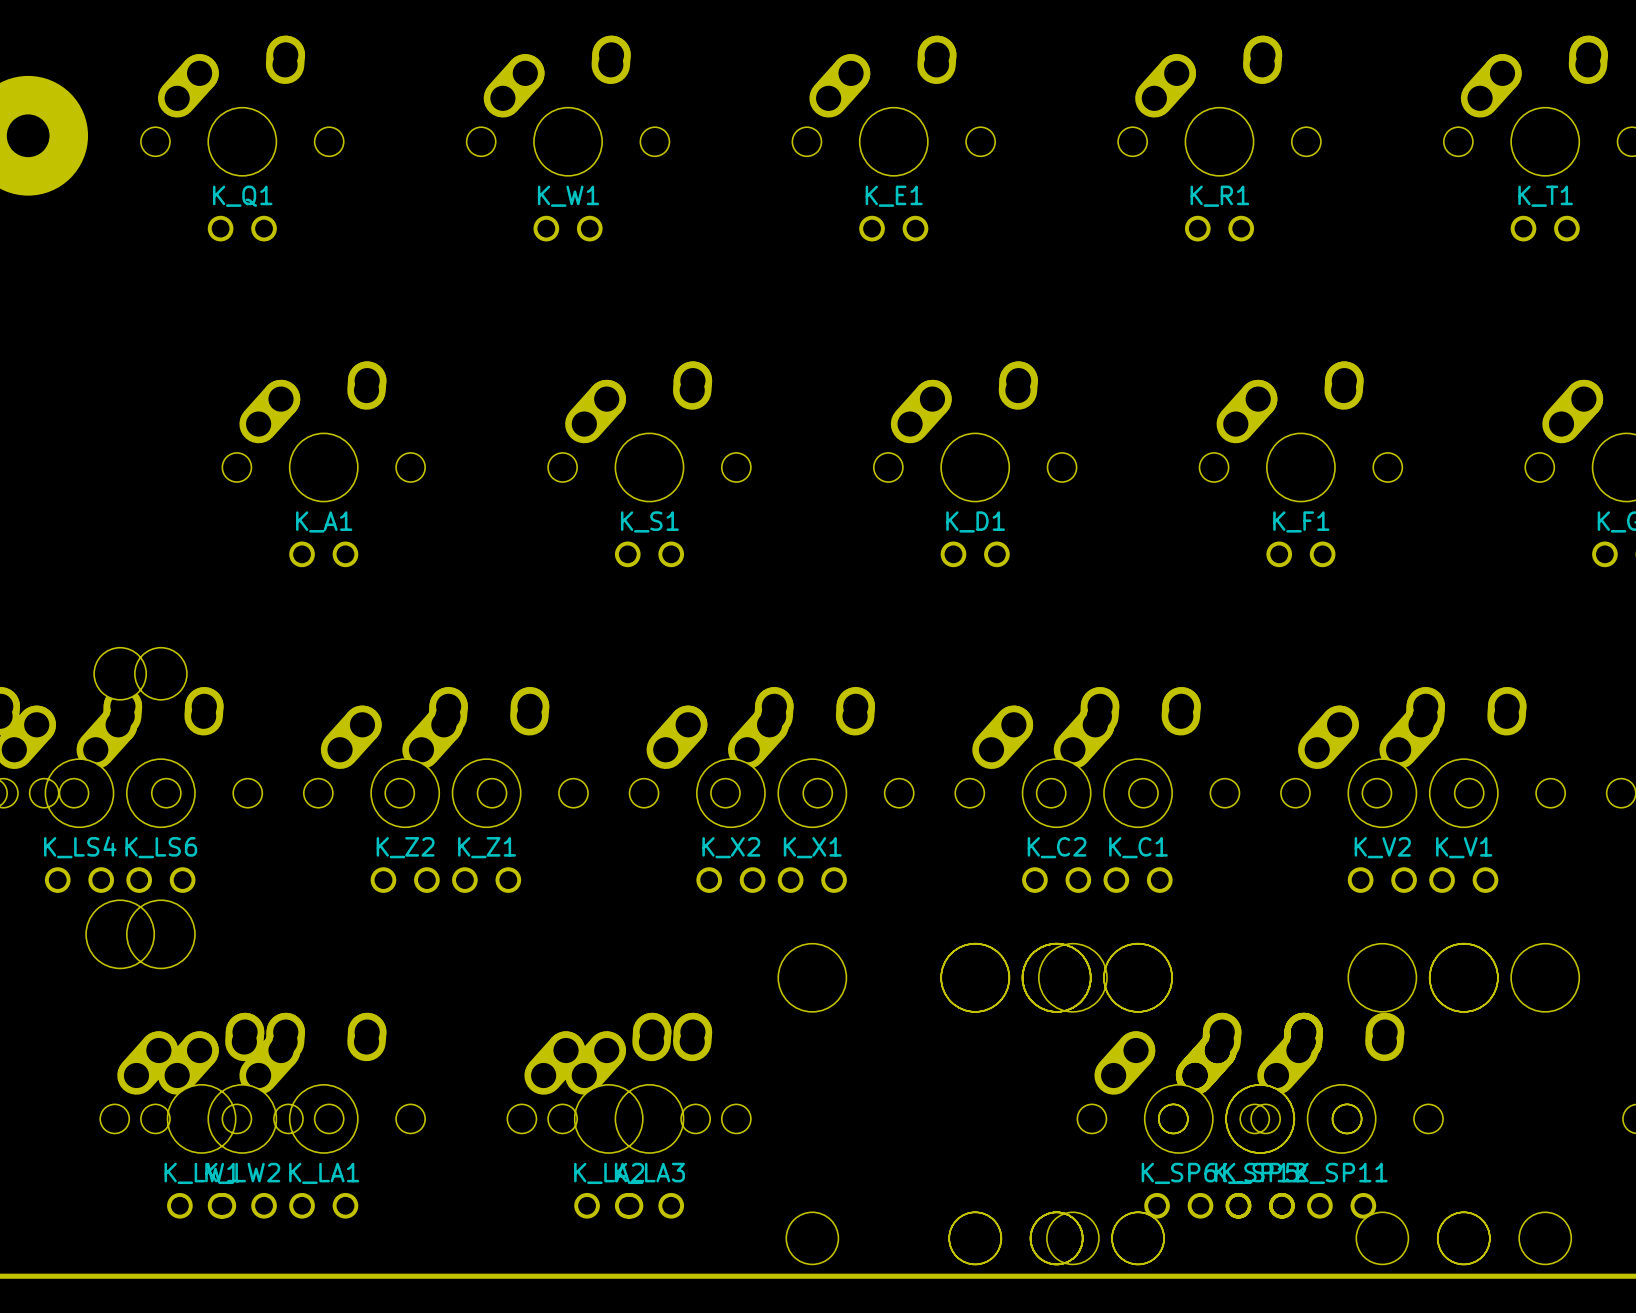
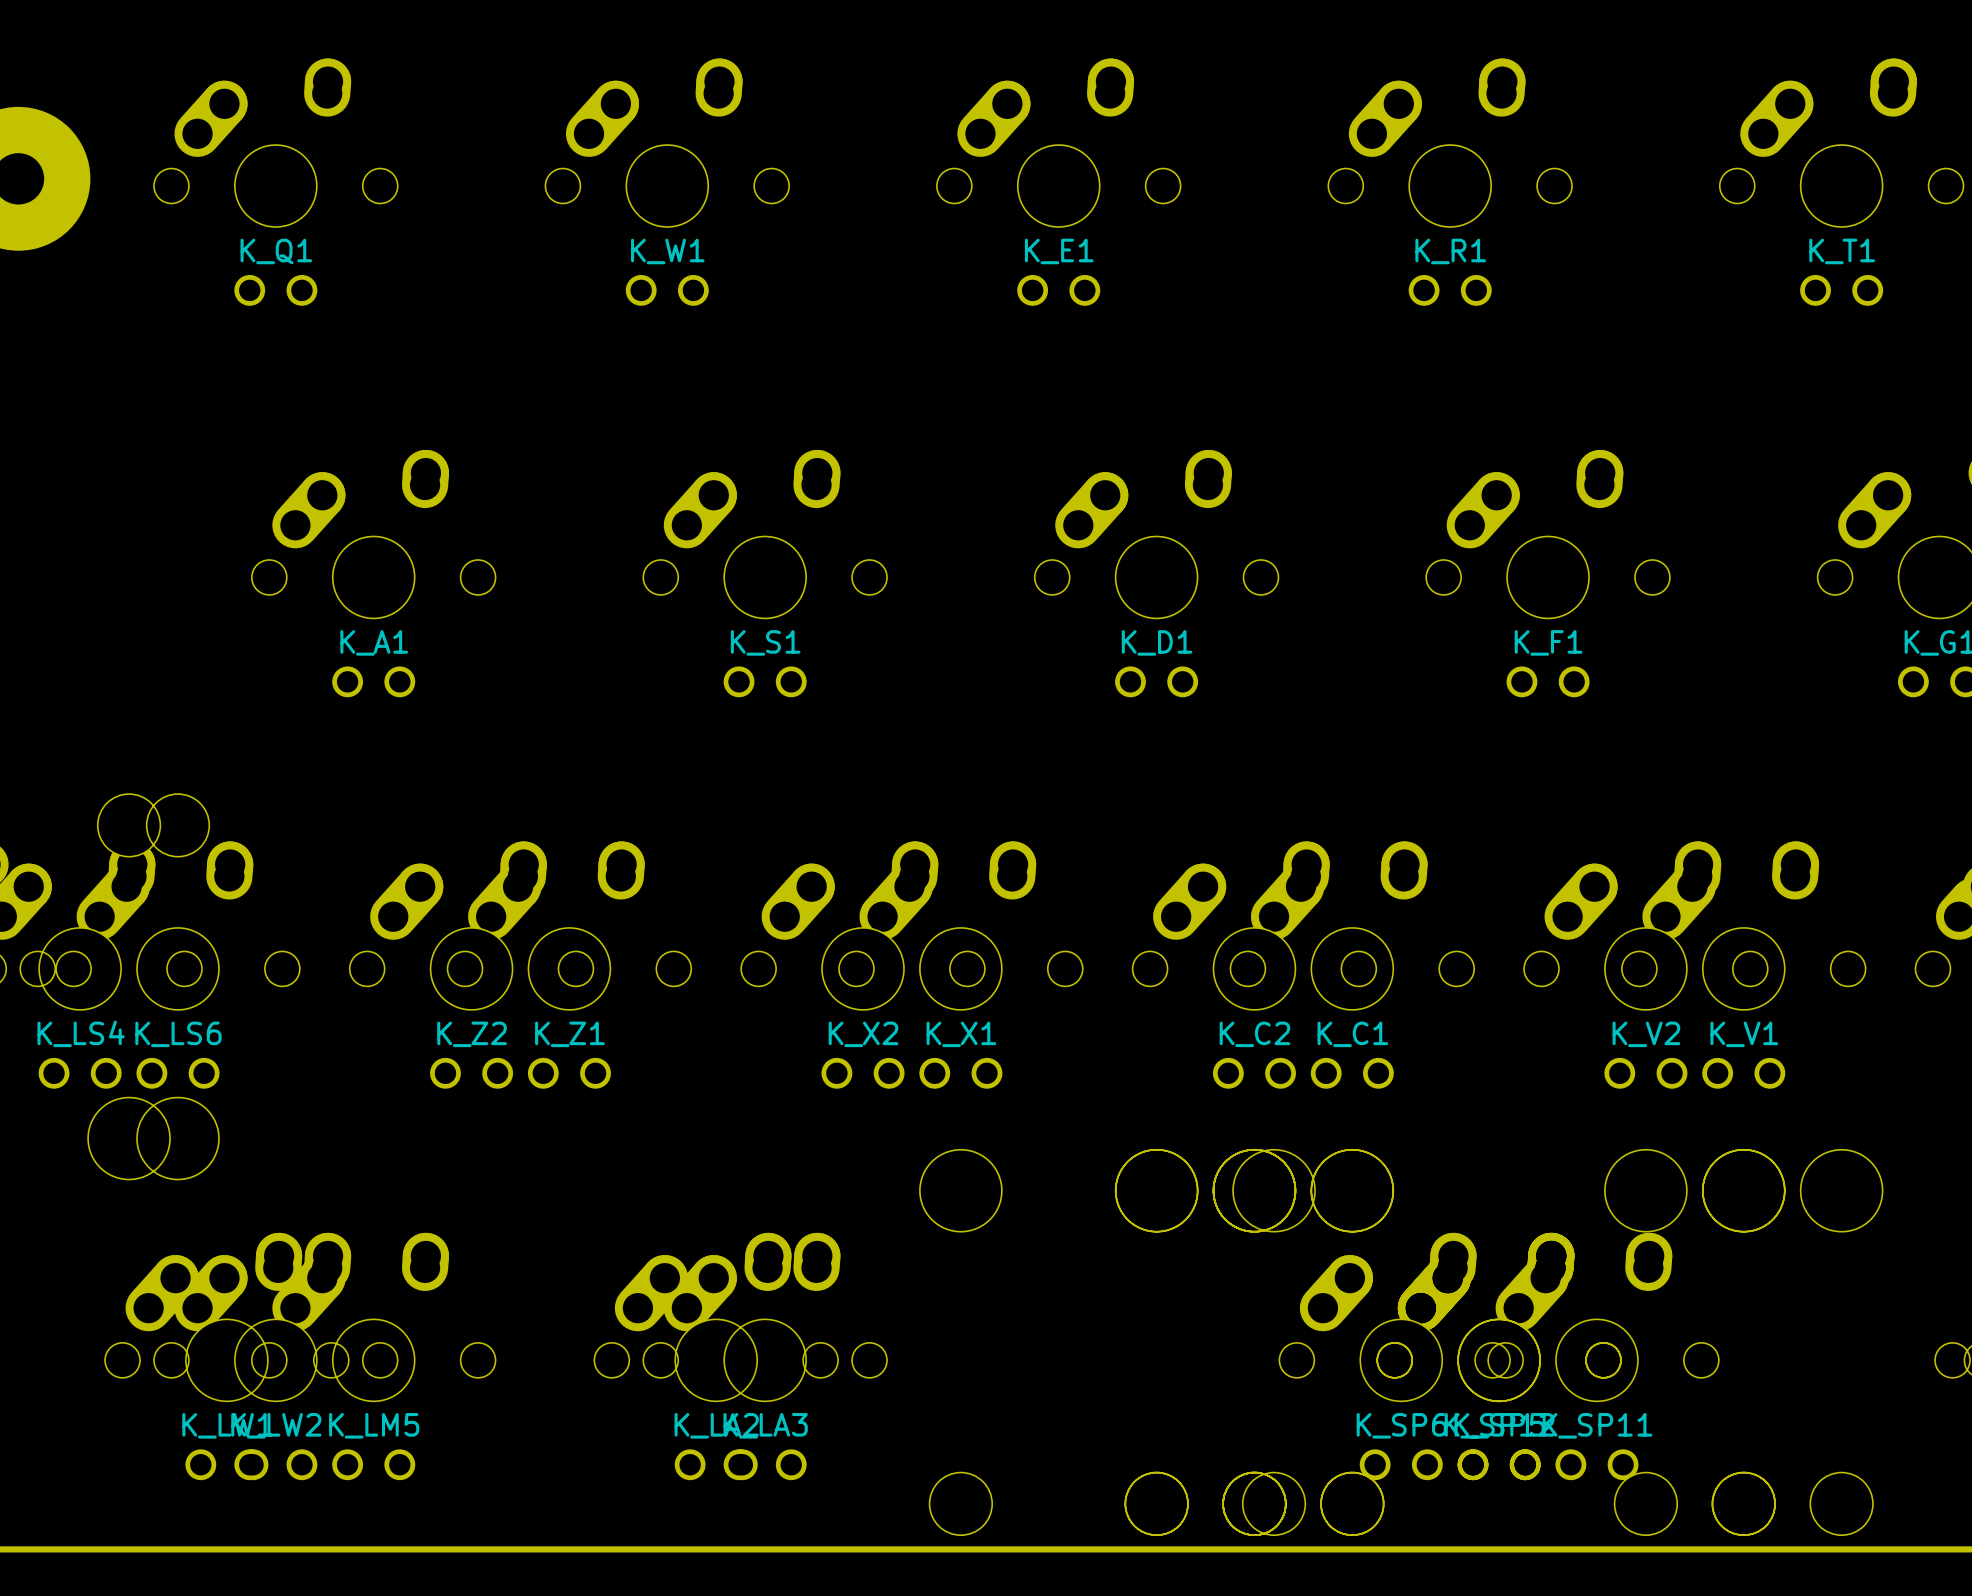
K_LA1 name: K_LA1 (324, 1173) -> K_LM5 (374, 1425)

